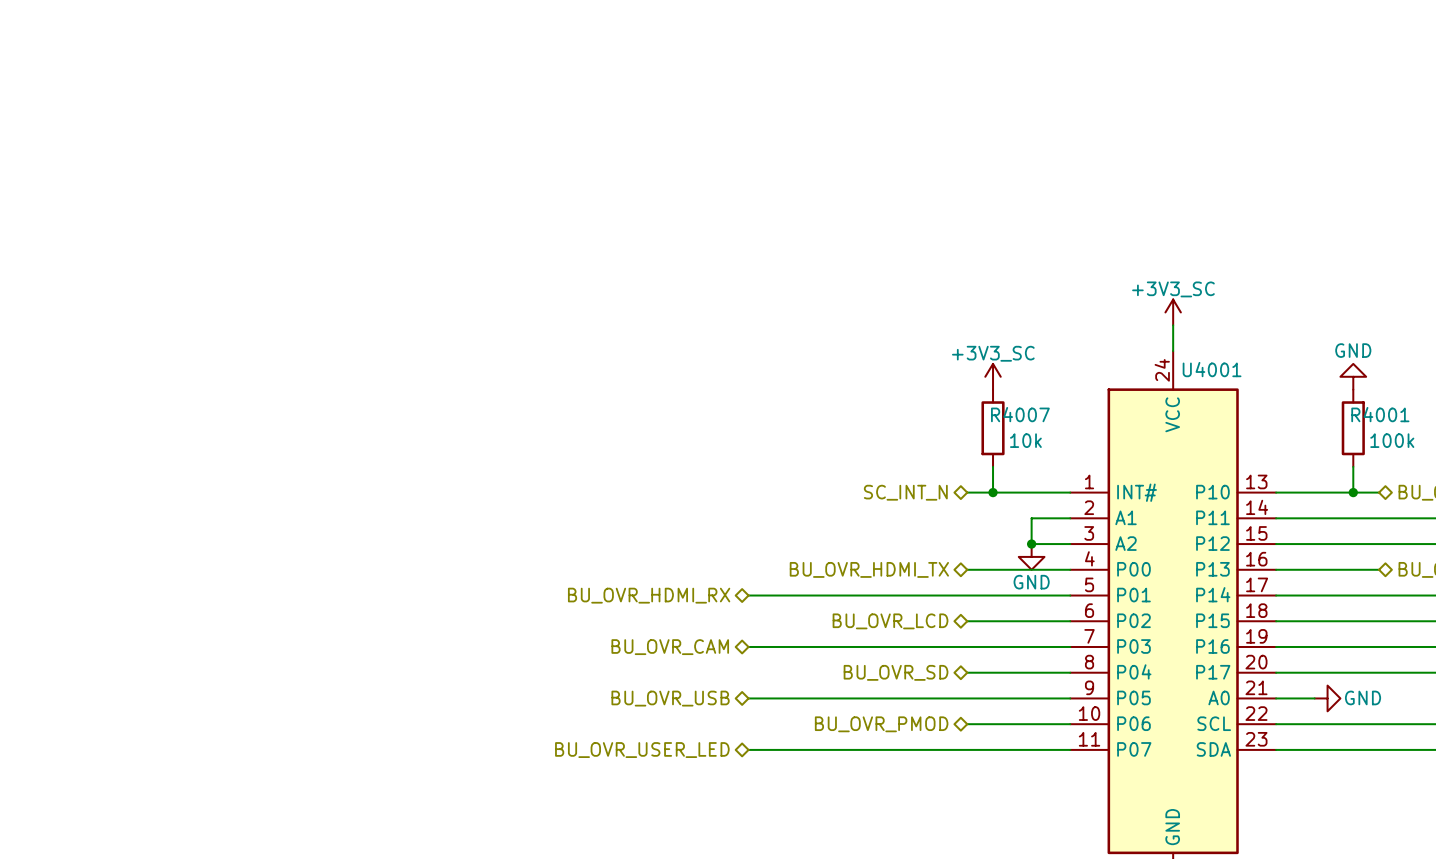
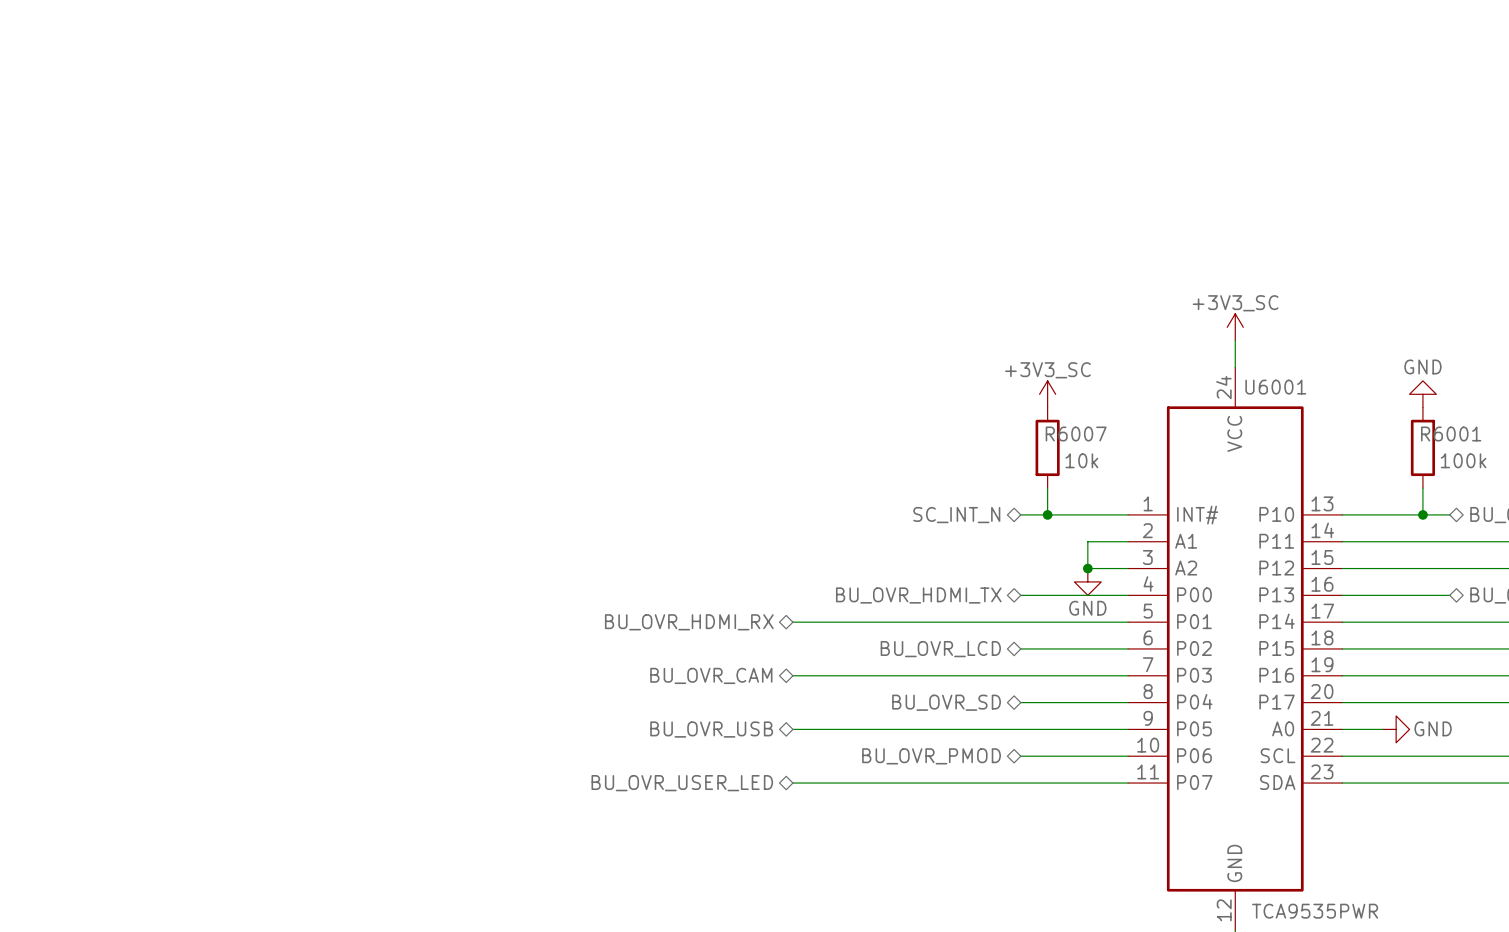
U4001 name: U4001 (1212, 369) -> U6001 (1275, 387)
R4007 name: R4007 (1020, 414) -> R6007 (1076, 434)
R4001 name: R4001 (1380, 414) -> R6001 (1451, 434)

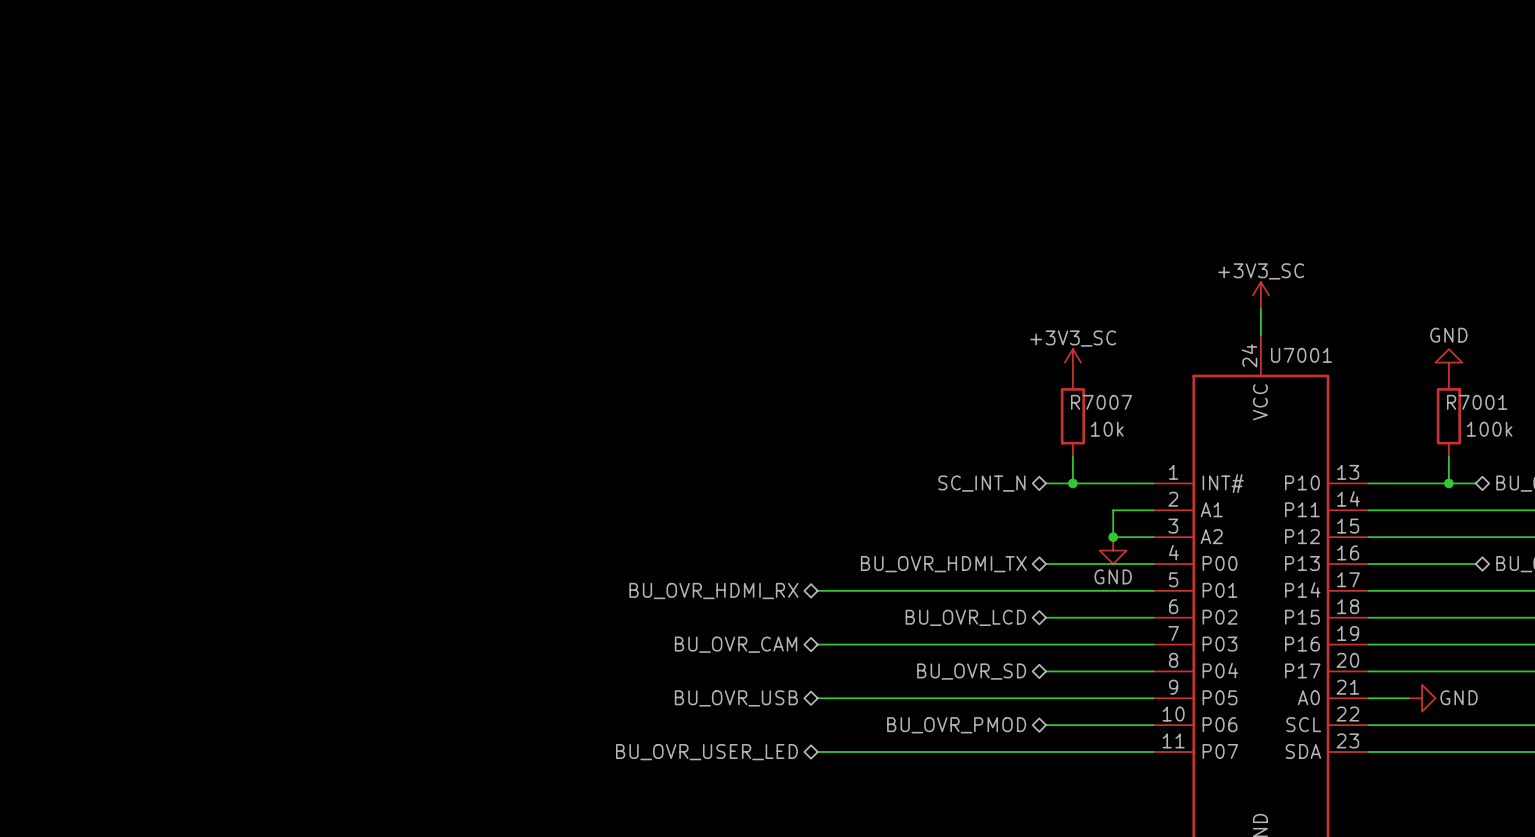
U6001 name: U6001 (1275, 387) -> U7001 (1301, 355)
R6007 name: R6007 (1076, 434) -> R7007 (1101, 402)
R6001 name: R6001 (1451, 434) -> R7001 (1477, 402)

